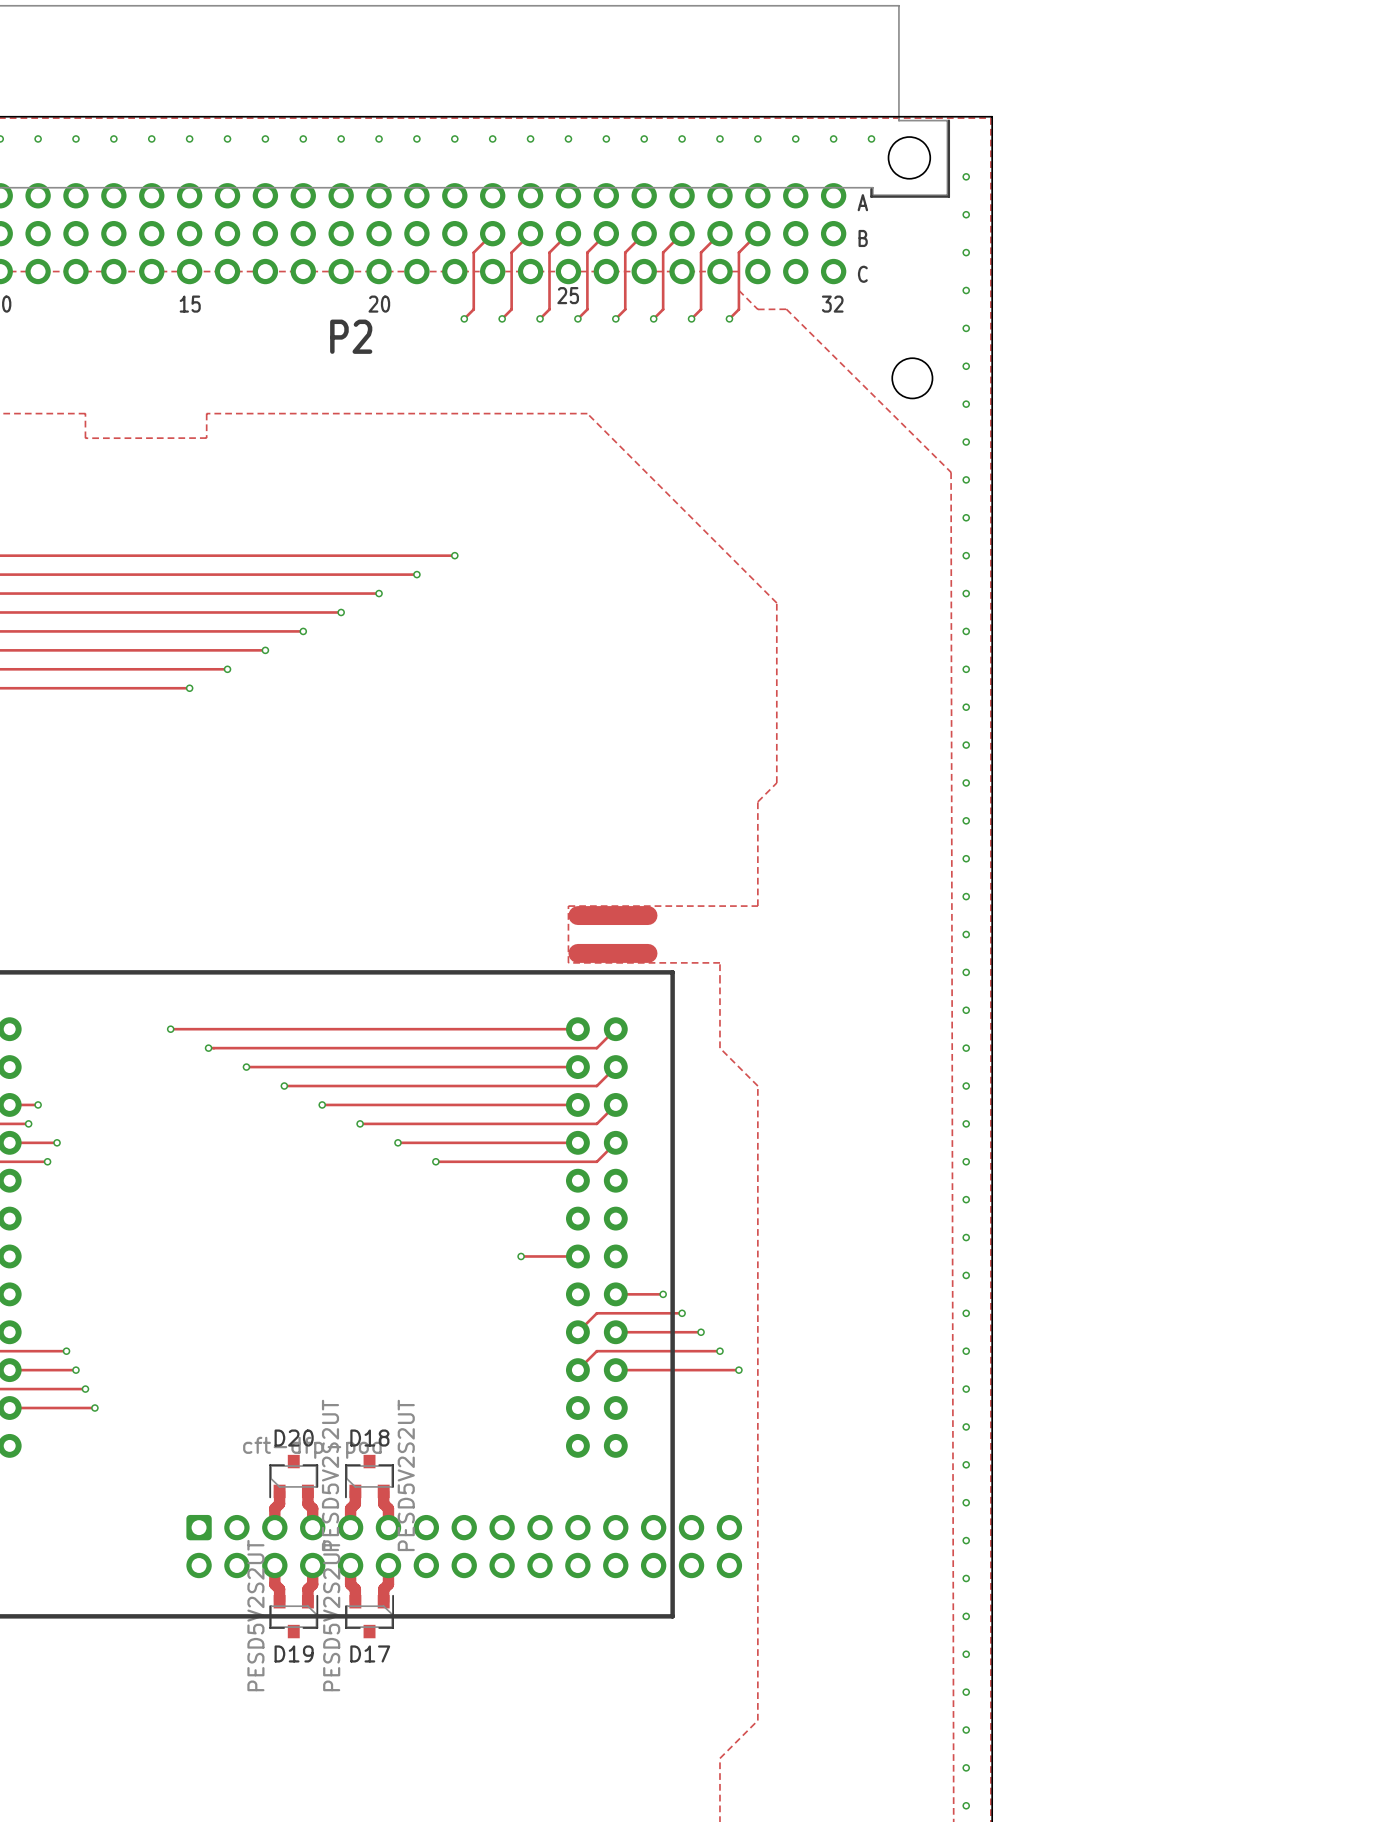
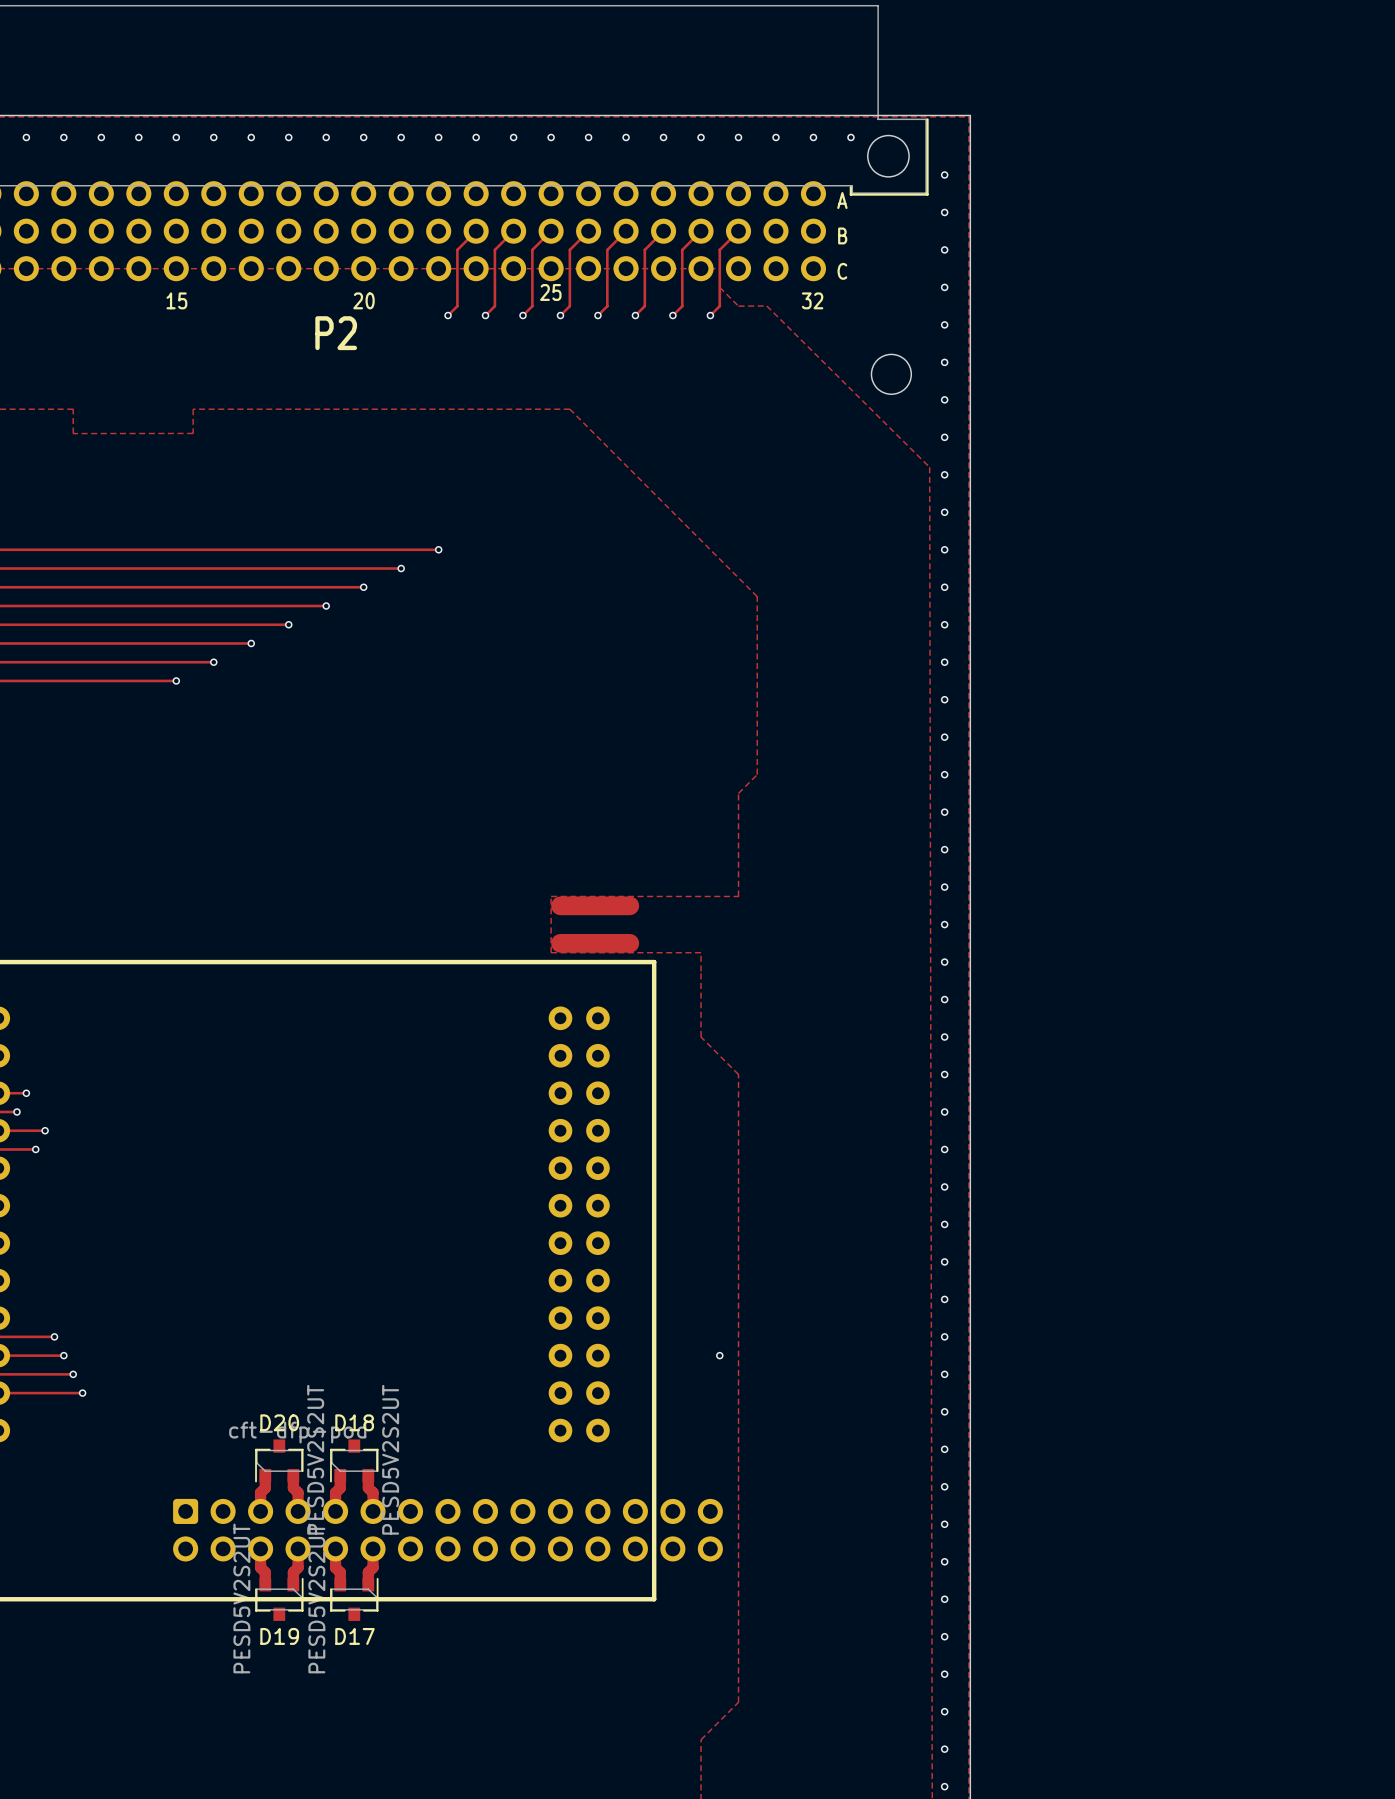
track: (170, 1029) (577, 1029) -> none
via: (170, 1029) -> none
track: (615, 1029) (596, 1048) (208, 1048) -> none
via: (208, 1048) -> none
track: (246, 1067) (577, 1067) -> none
via: (246, 1067) -> none
track: (615, 1067) (596, 1086) (284, 1086) -> none
via: (284, 1086) -> none
track: (322, 1104) (577, 1104) -> none
via: (322, 1104) -> none
track: (615, 1104) (596, 1123) (360, 1123) -> none
via: (360, 1123) -> none
track: (397, 1142) (577, 1142) -> none
via: (397, 1142) -> none
track: (615, 1142) (596, 1161) (435, 1161) -> none
via: (435, 1161) -> none
track: (521, 1256) (577, 1256) -> none
via: (521, 1256) -> none
track: (615, 1294) (663, 1294) -> none
via: (663, 1294) -> none
track: (682, 1313) (596, 1313) (577, 1332) -> none
via: (682, 1313) -> none
track: (615, 1332) (701, 1332) -> none
via: (701, 1332) -> none
track: (719, 1351) (596, 1351) (577, 1370) -> none
via: (719, 1351) -> none
track: (615, 1370) (738, 1370) -> none

